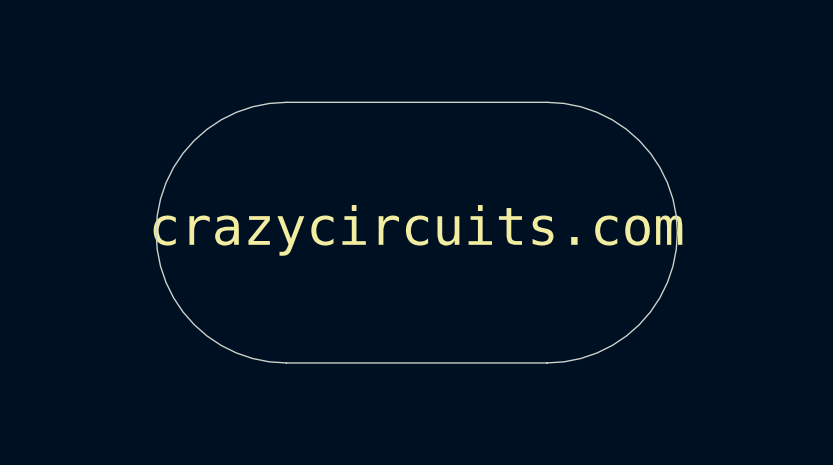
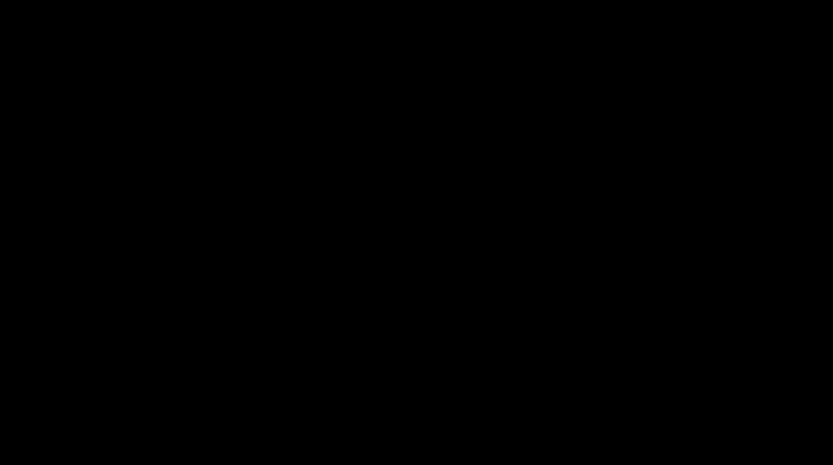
part: (416, 232) -> none

